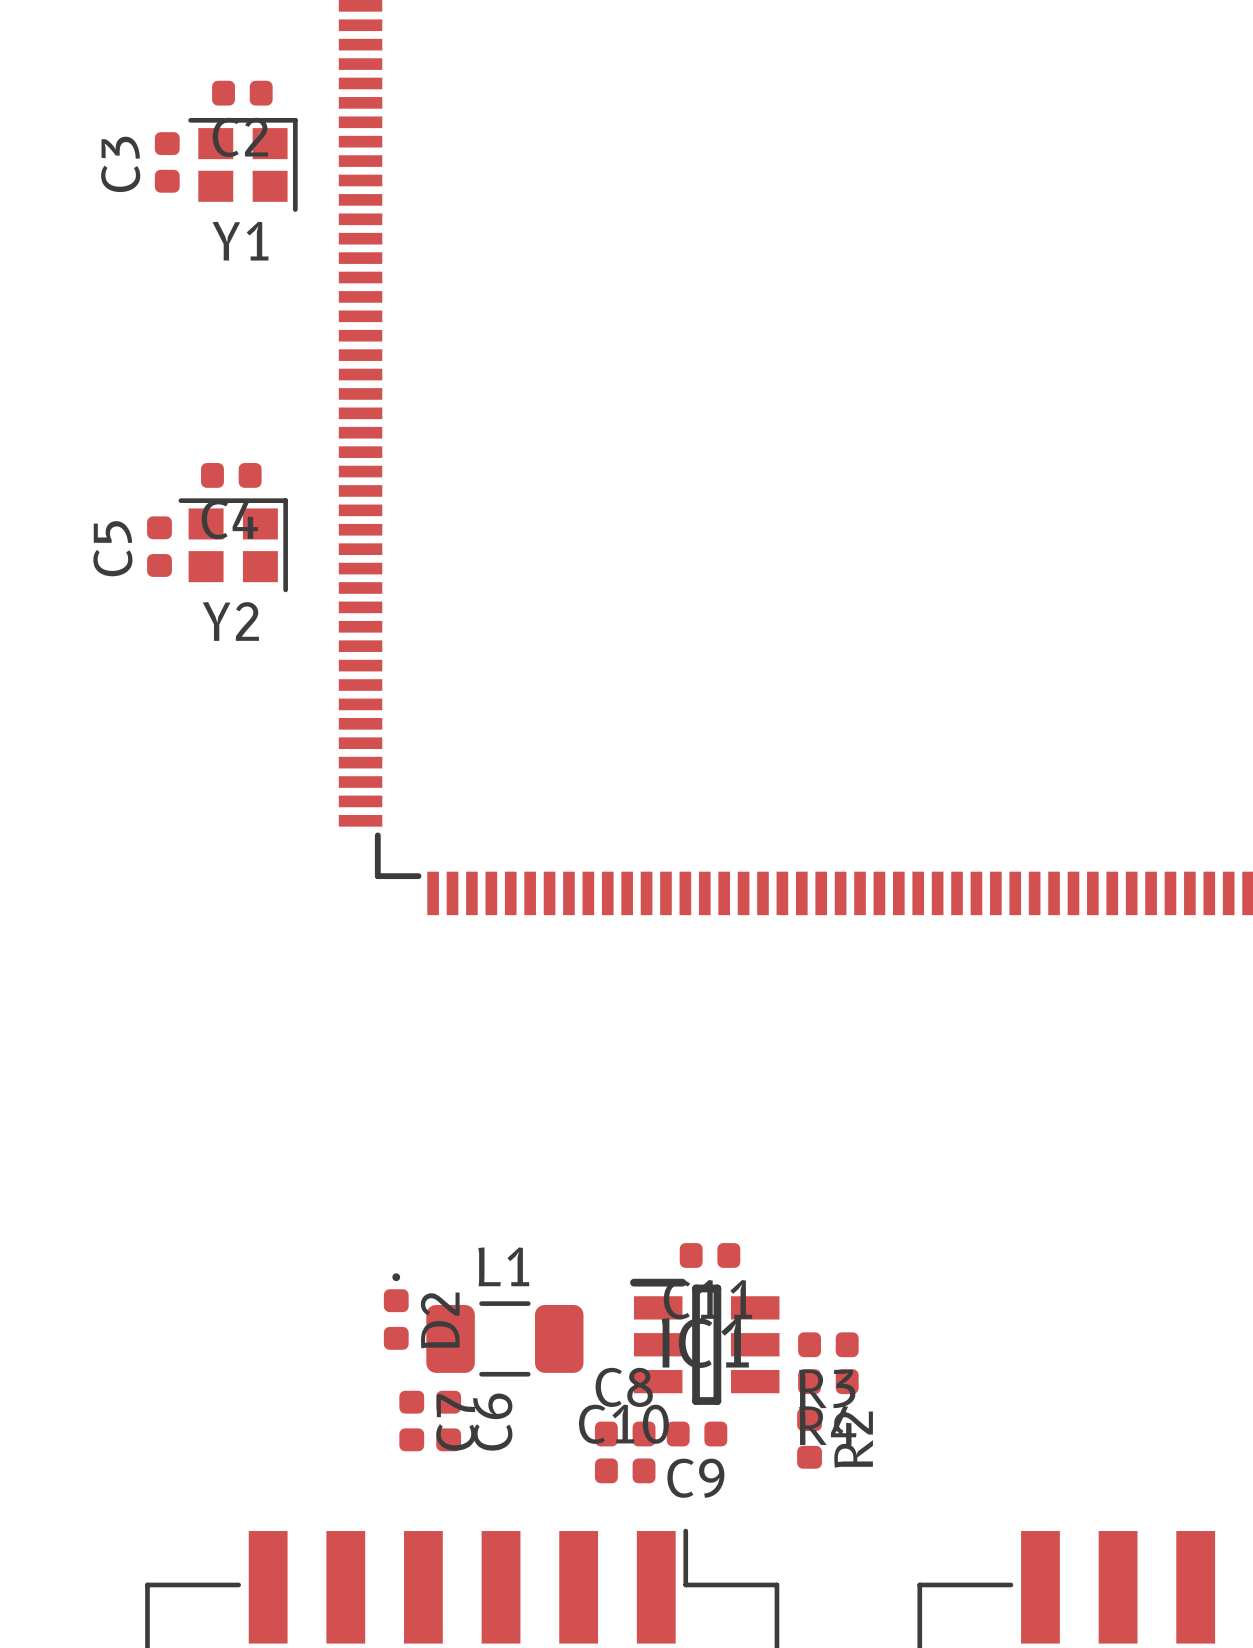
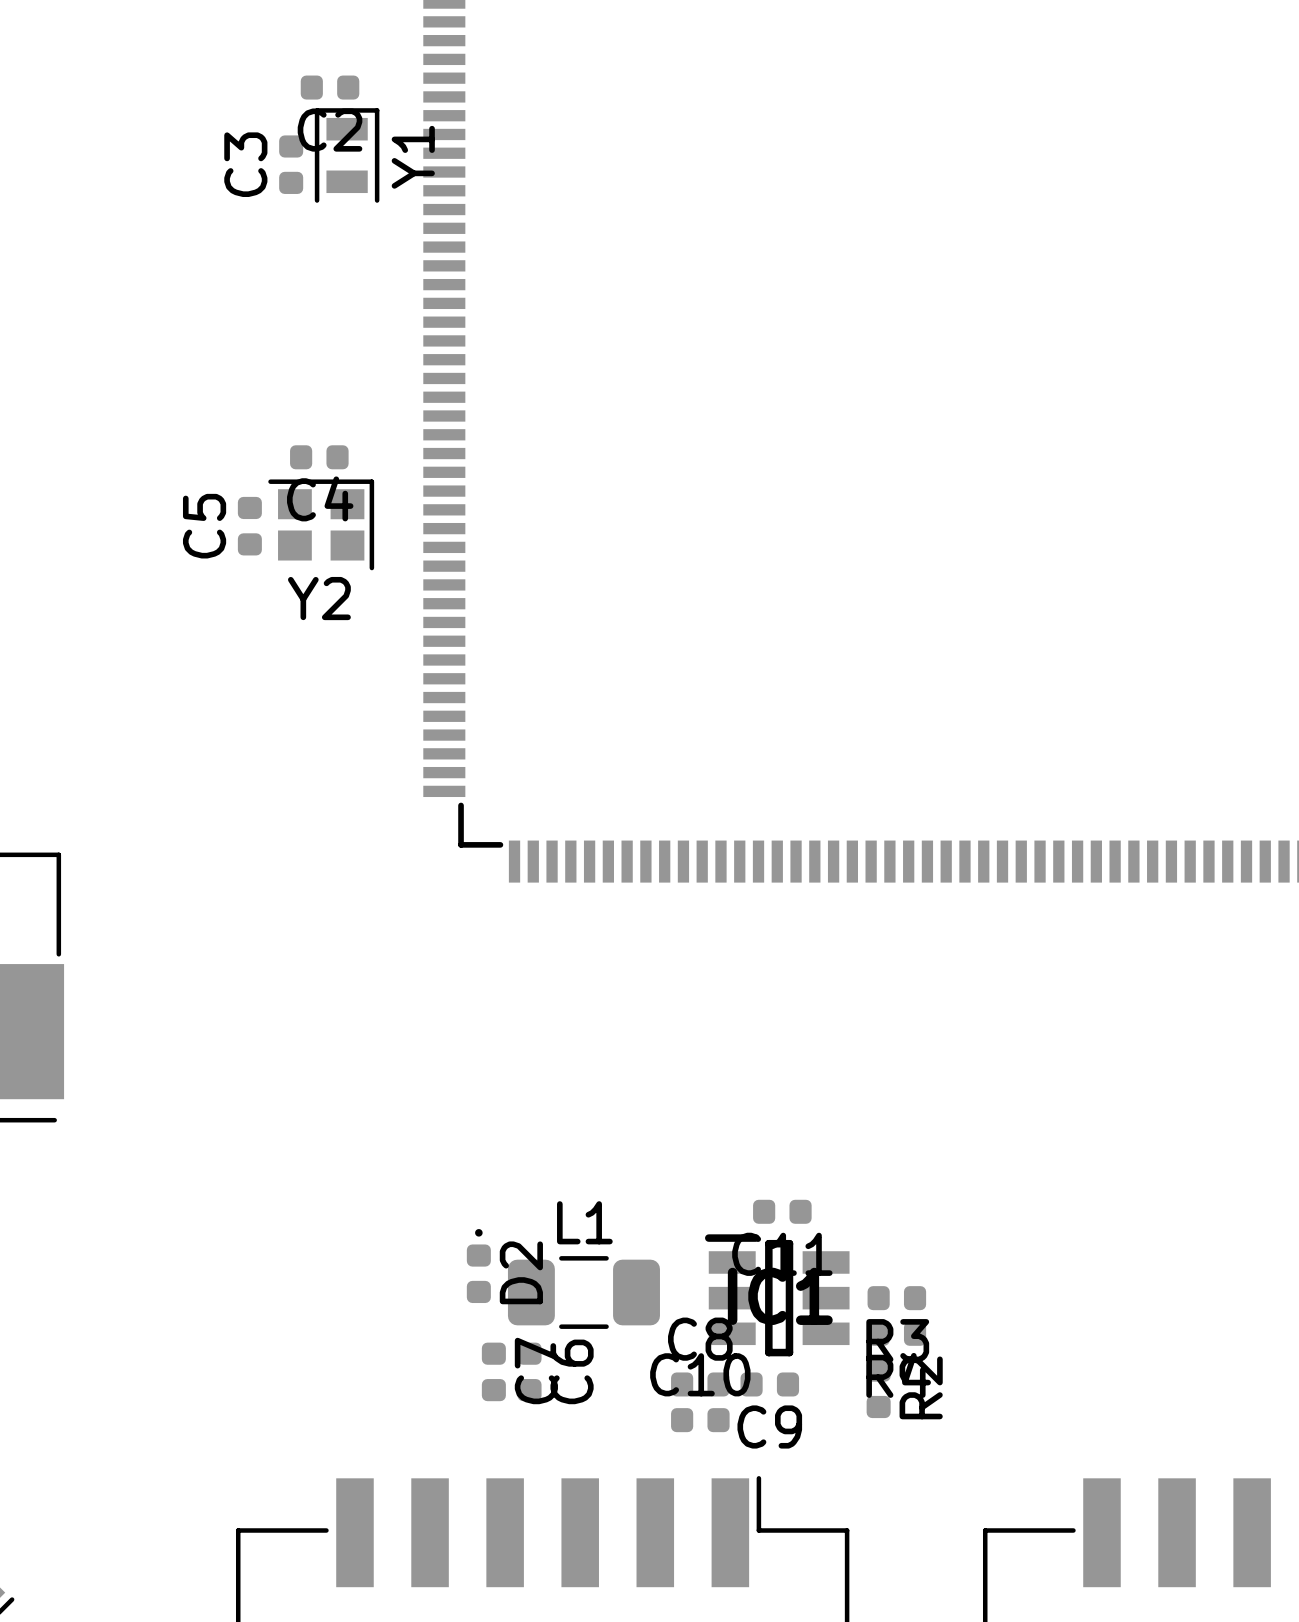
Y1 footprint: [188, 118, 298, 212] -> [314, 108, 380, 203]
C3 position: (167, 162) -> (291, 164)
Y1 name position: Y1 (240, 241) -> Y1 (413, 157)

